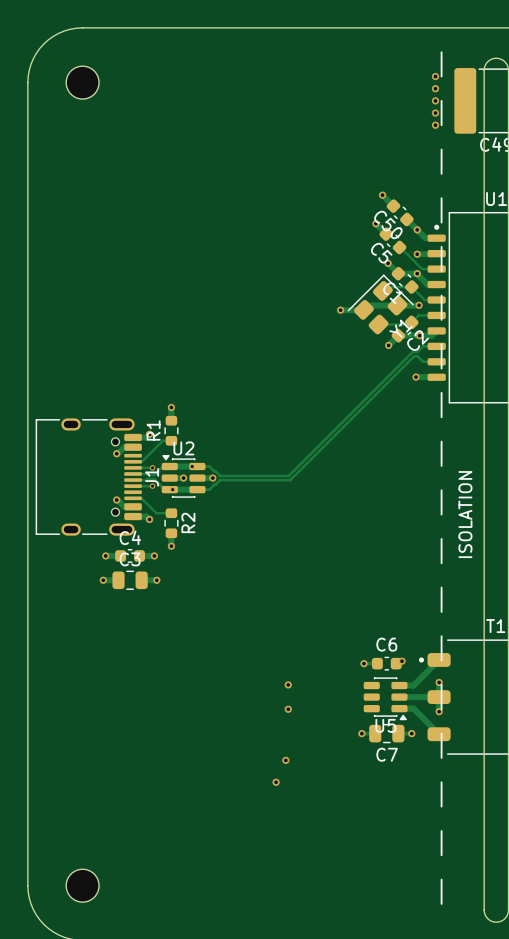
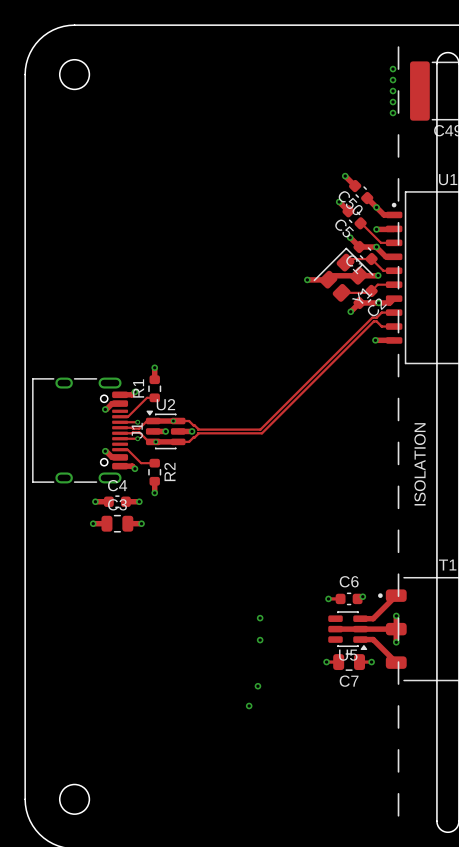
track: none -> (335, 629) (360, 629)

